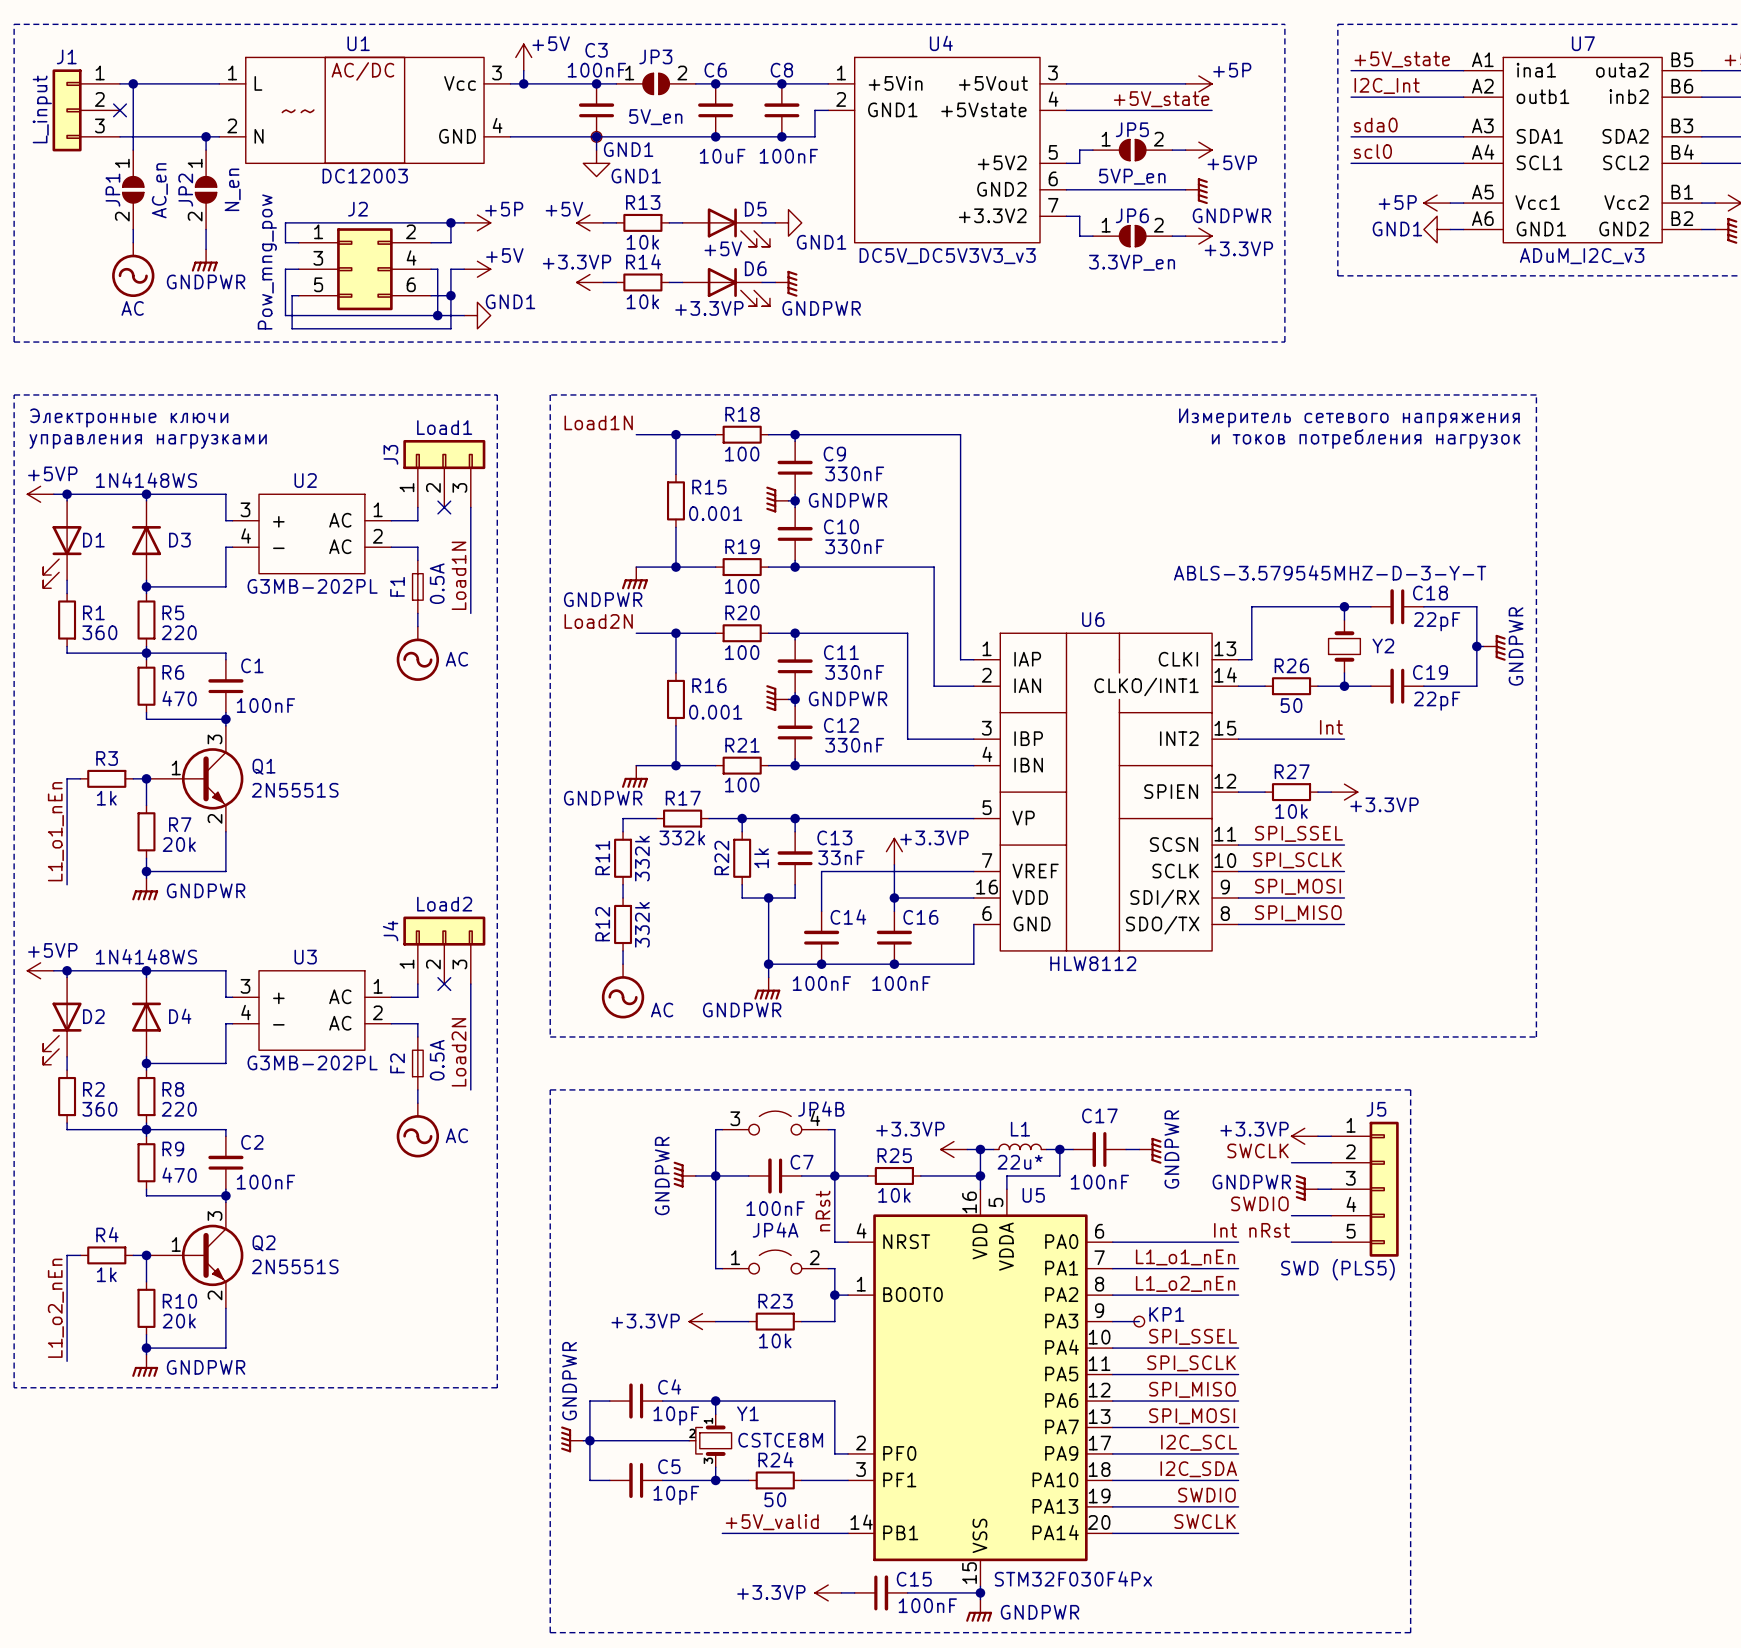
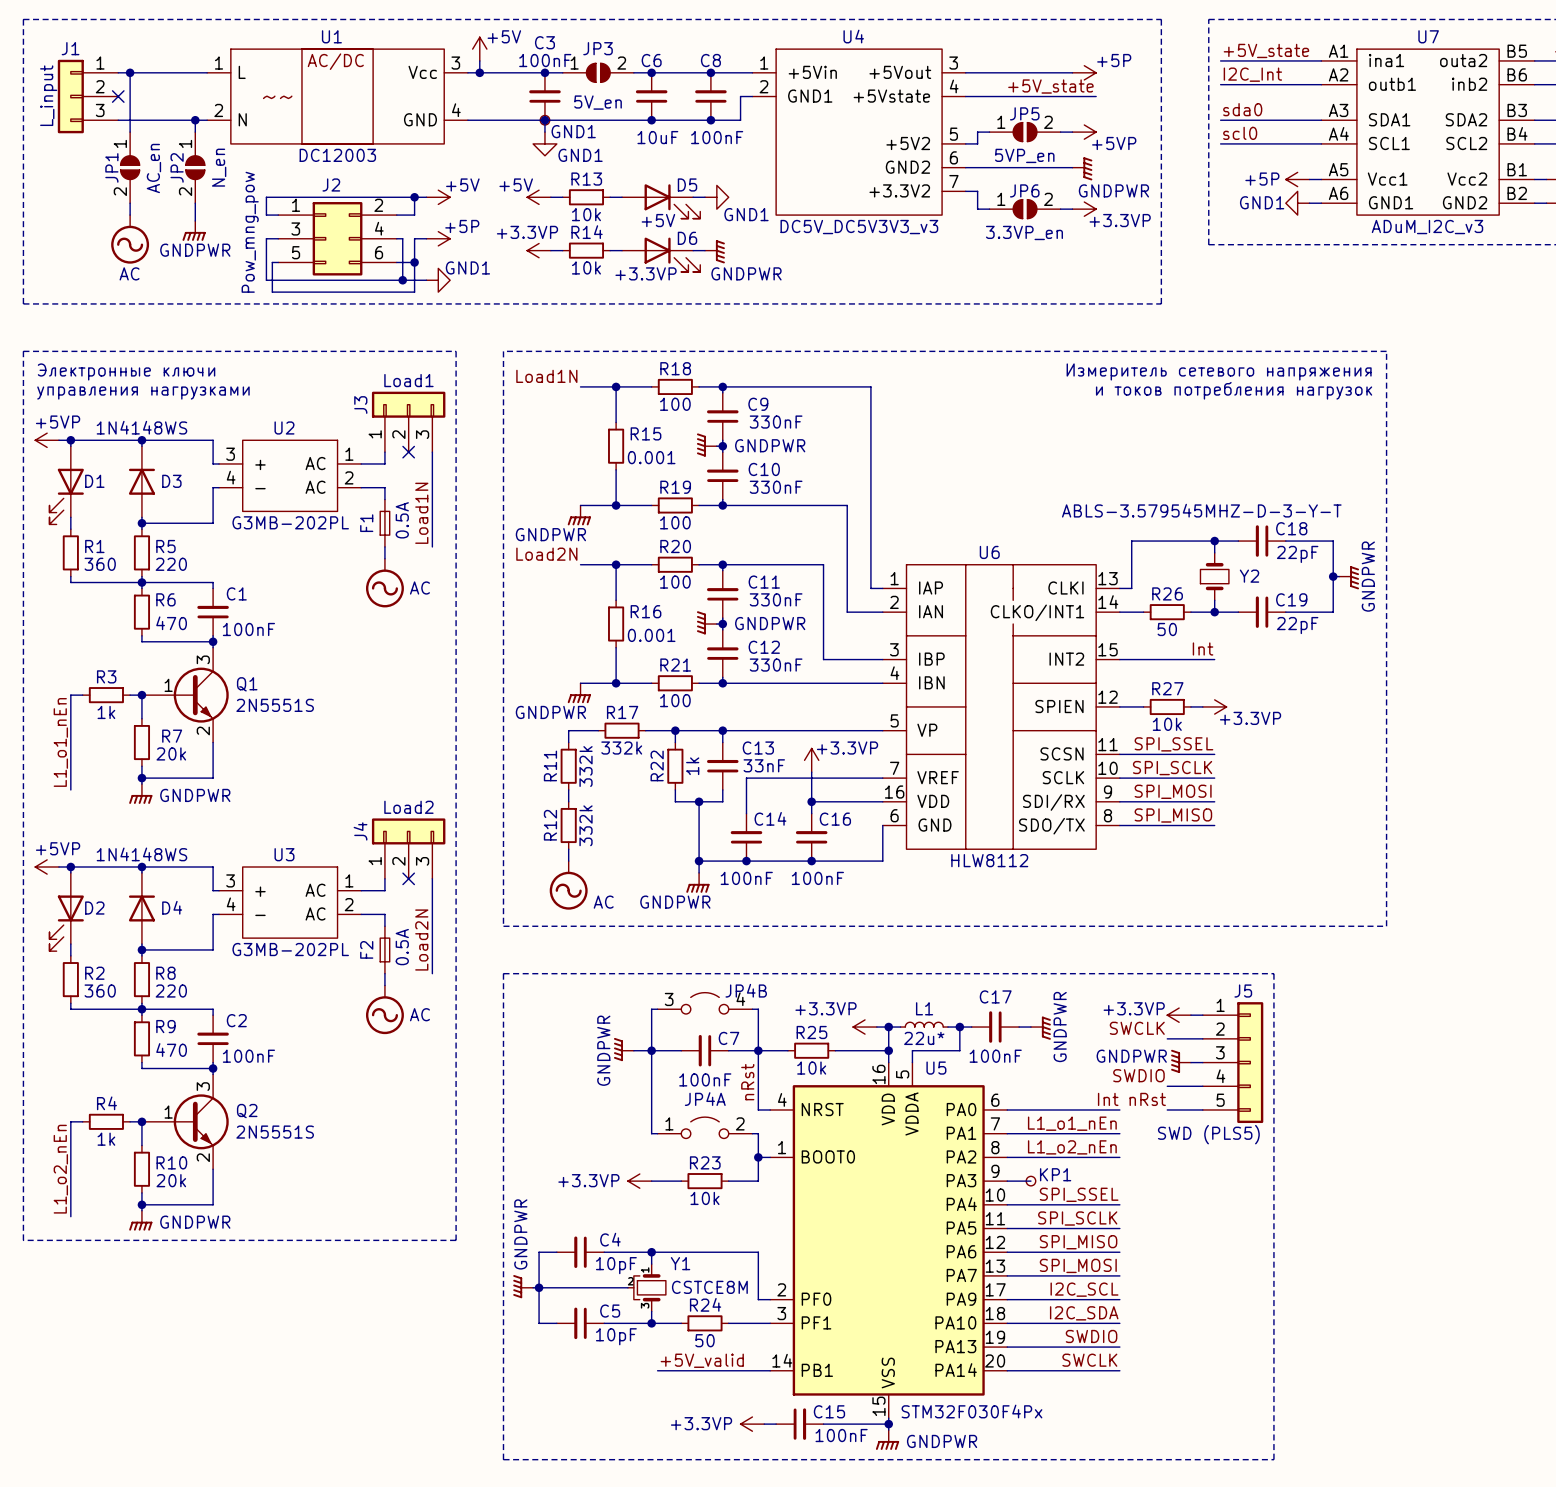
power symbol: +5P (477, 222) -> +5V (438, 197)
power symbol: +5V (477, 269) -> +5P (438, 238)

